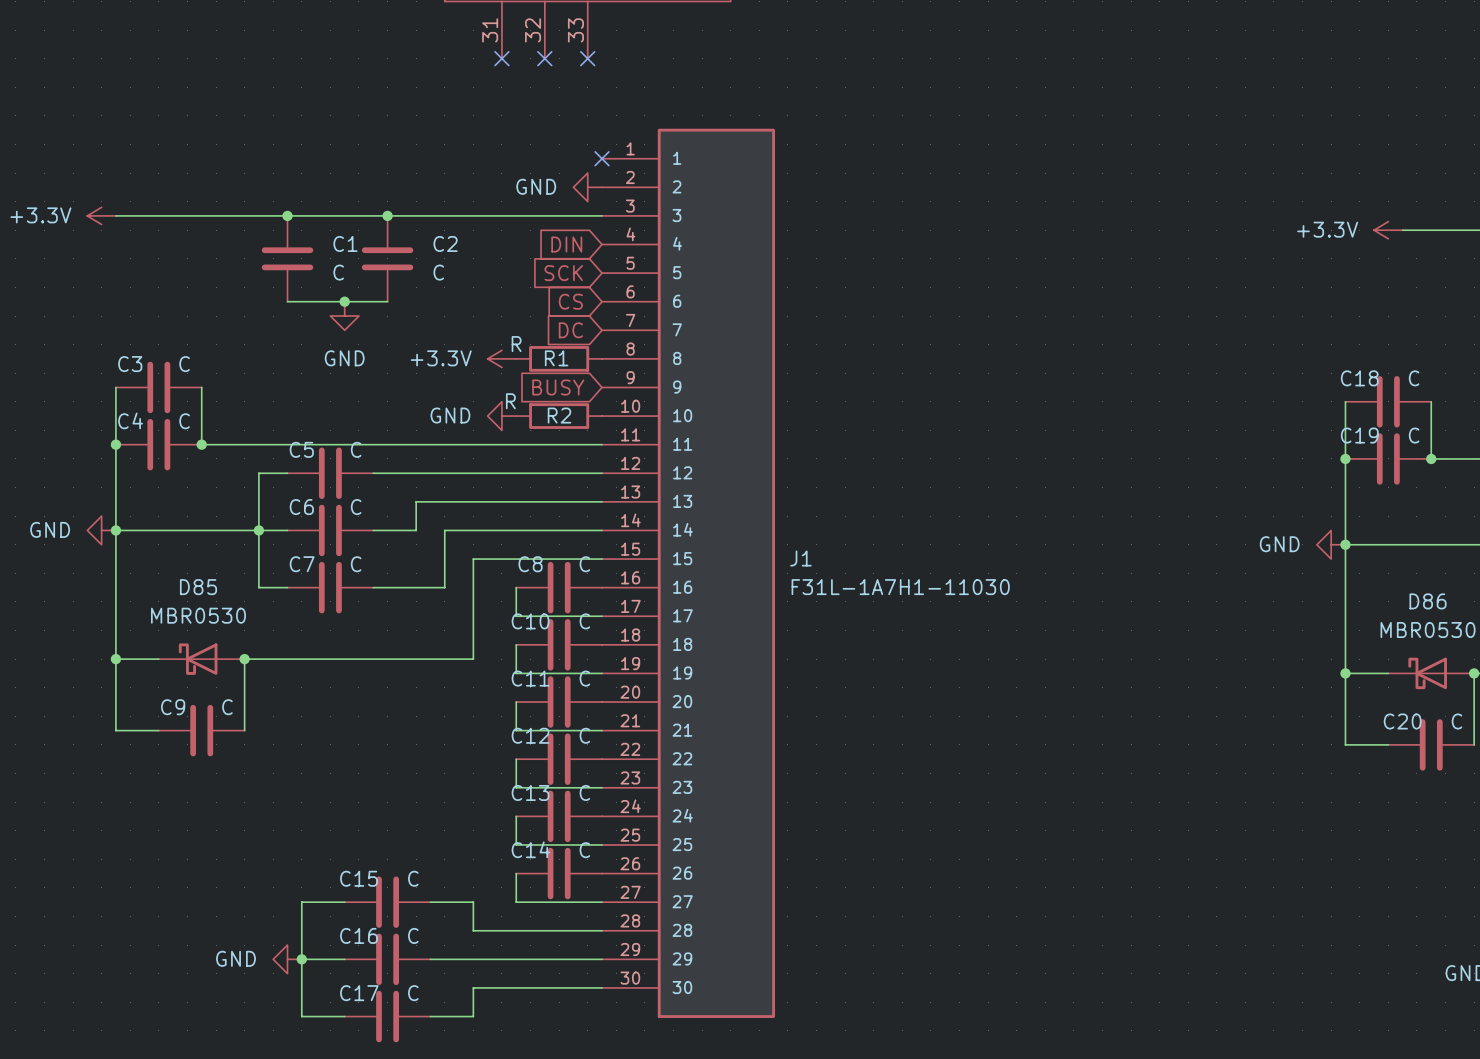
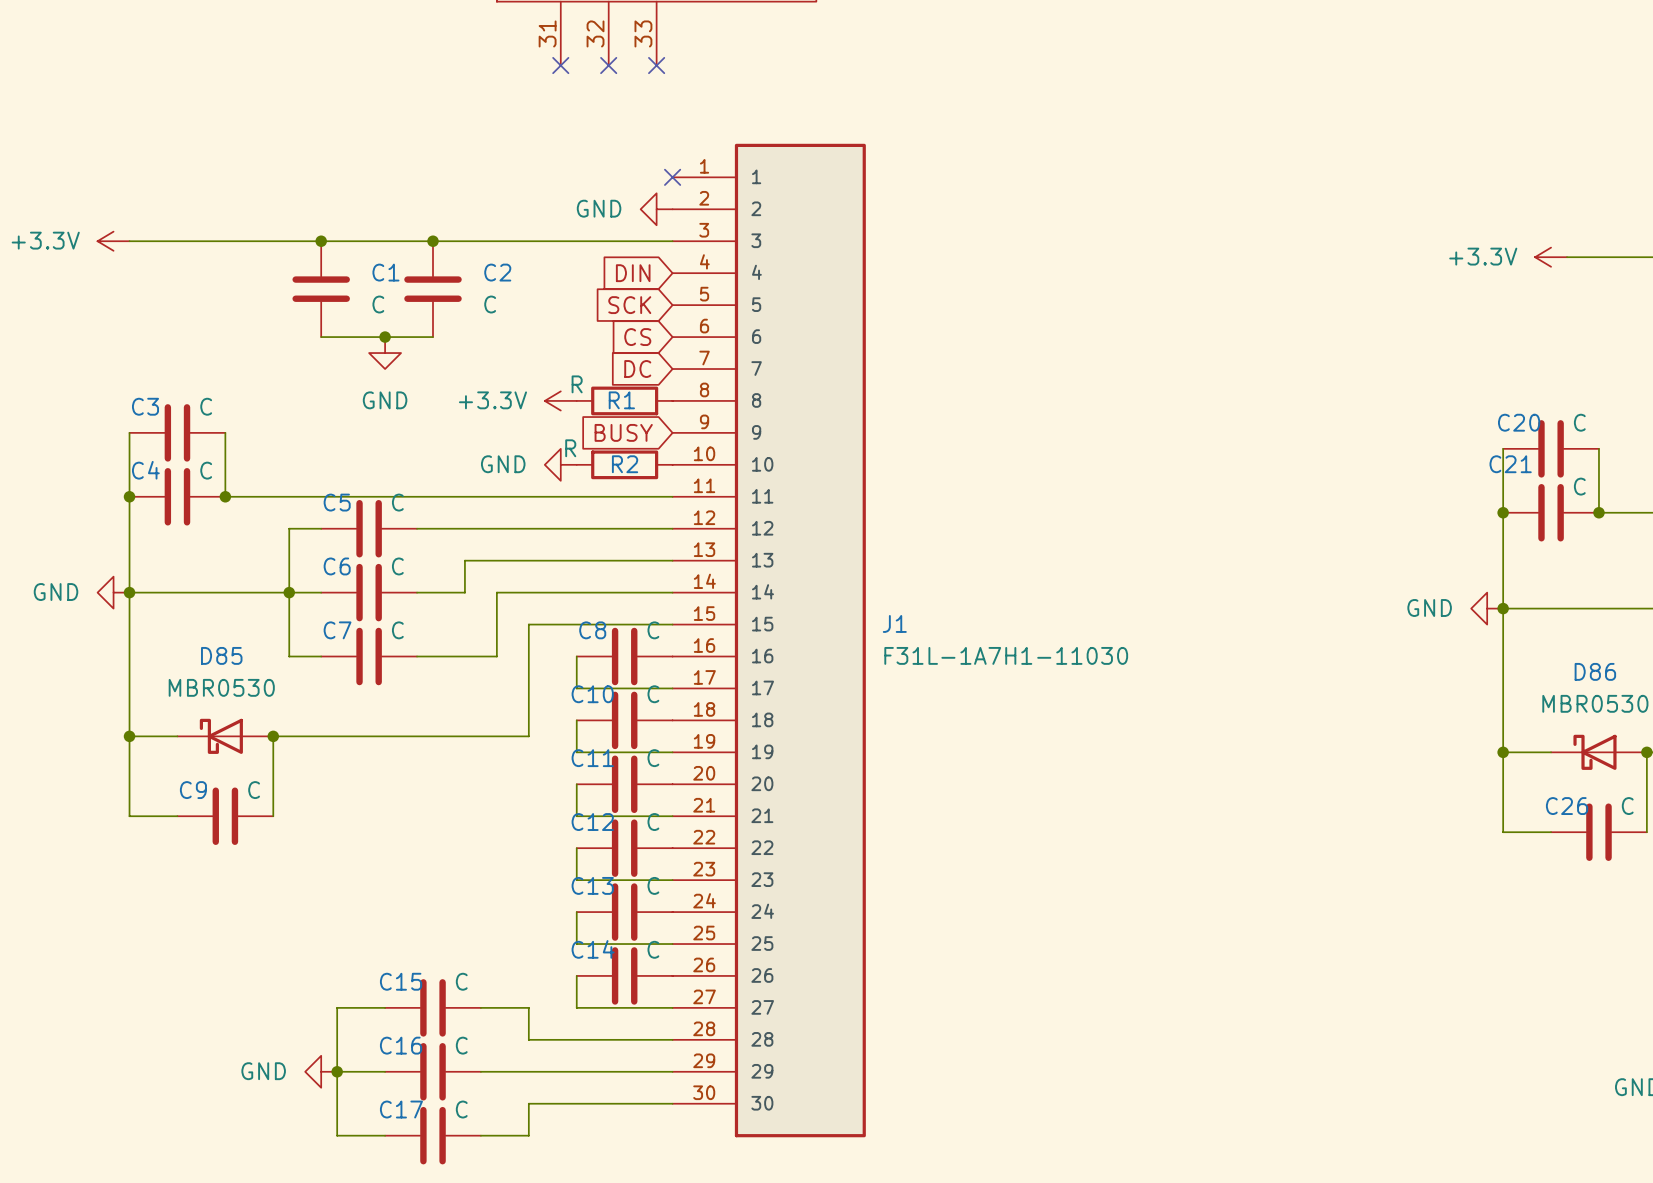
C18 name: C18 (1359, 378) -> C20 (1519, 422)
C19 name: C19 (1359, 435) -> C21 (1510, 464)
C20 name: C20 (1402, 721) -> C26 (1567, 806)

